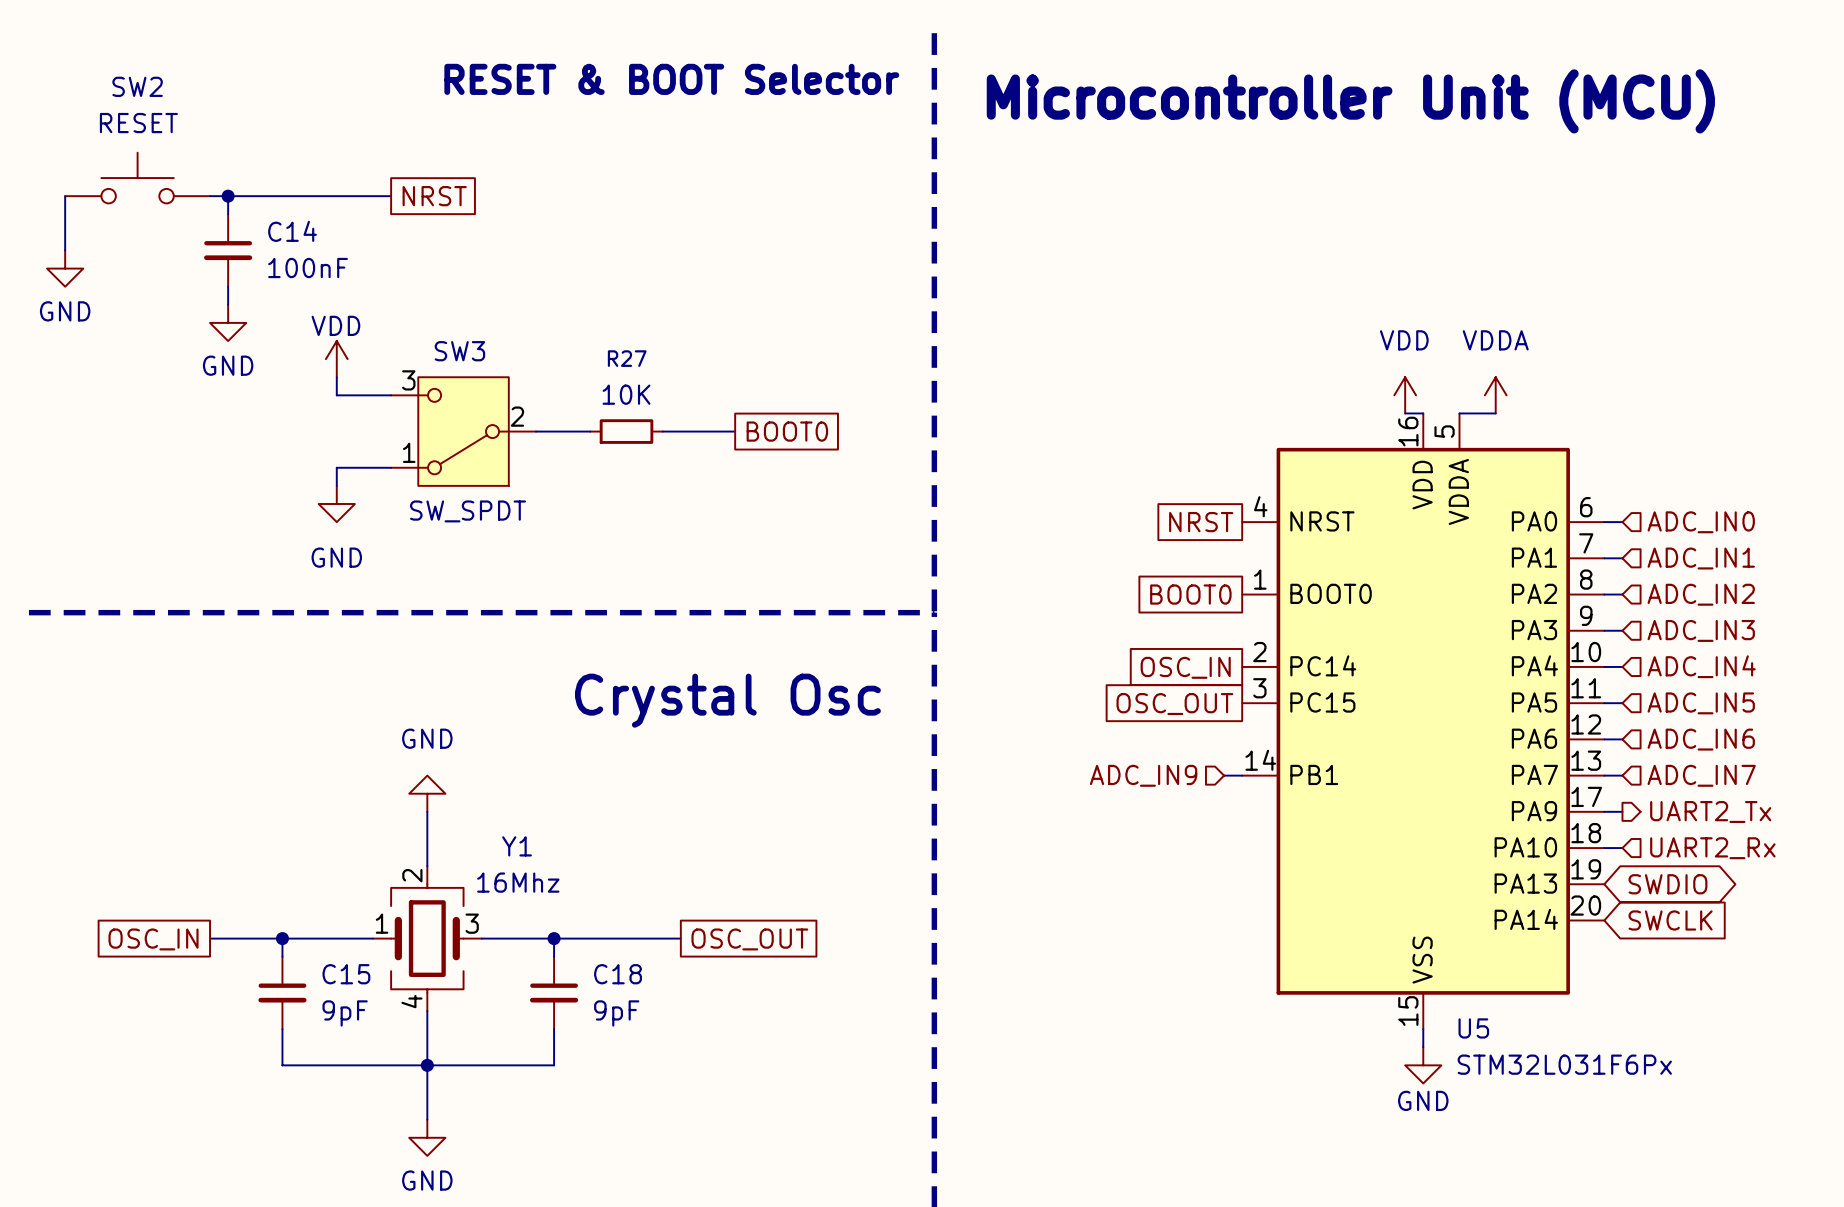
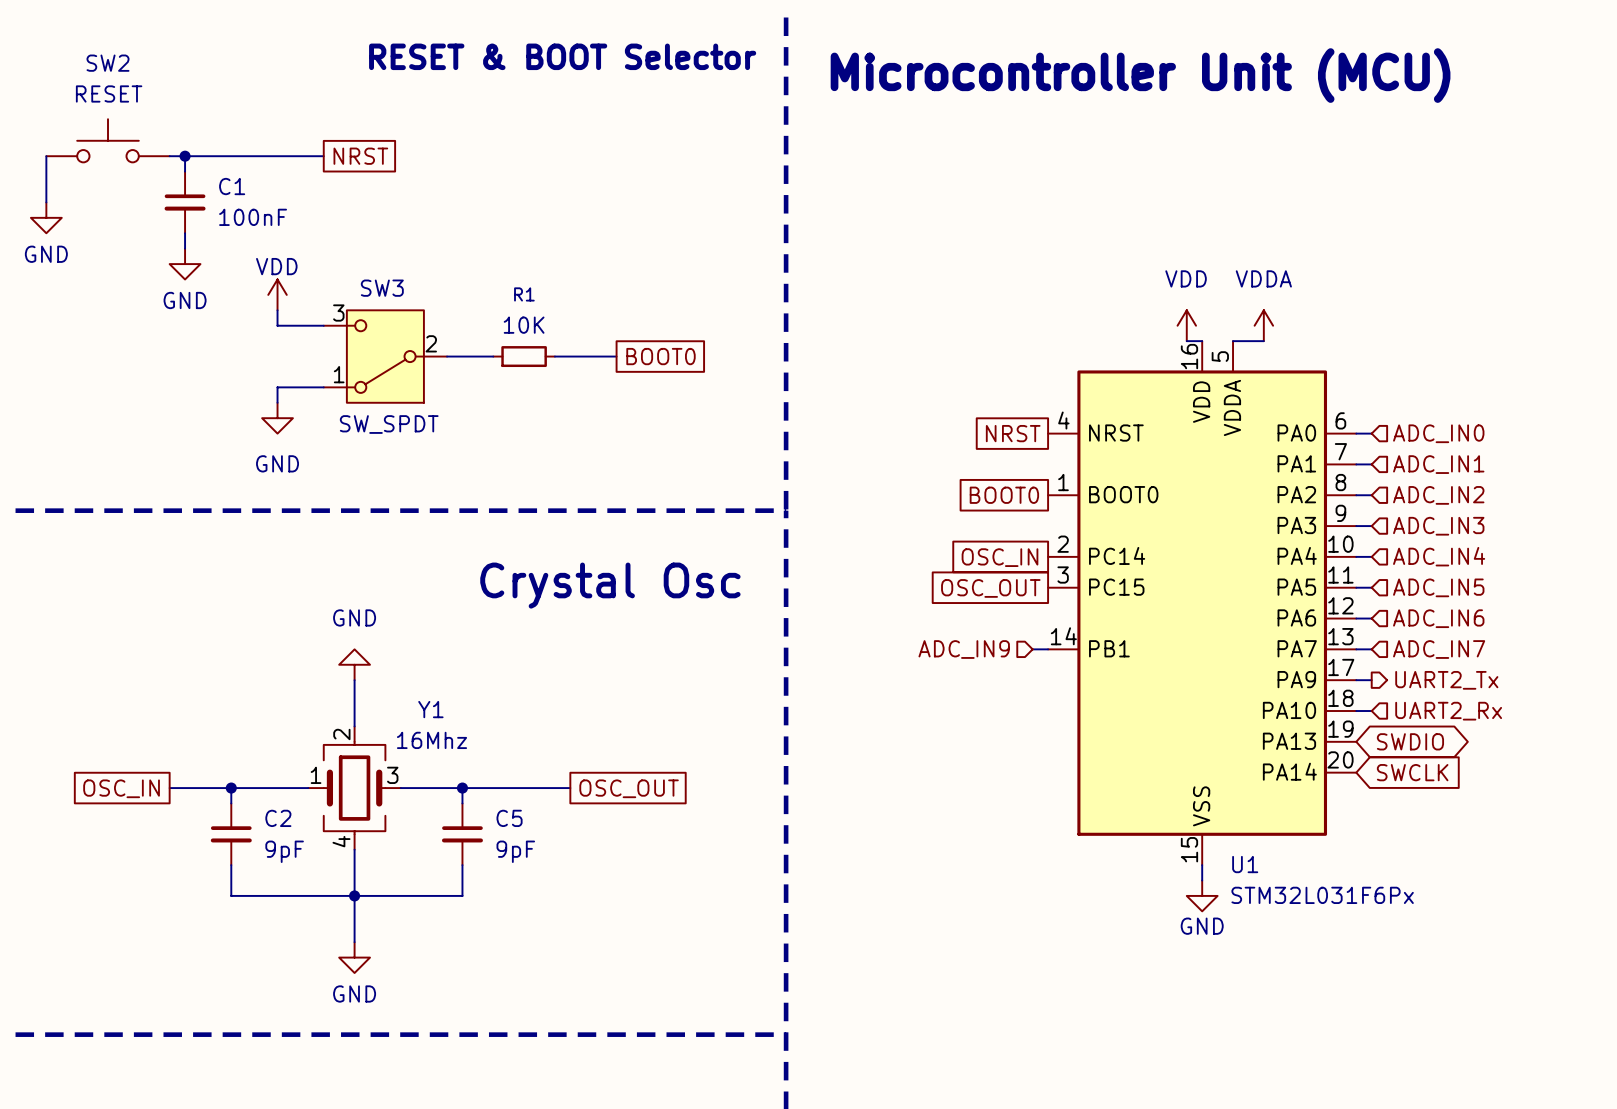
C14 name: C14 (292, 231) -> C1 (232, 186)
R27 name: R27 (627, 358) -> R1 (524, 294)
C15 name: C15 (346, 974) -> C2 (278, 818)
C18 name: C18 (618, 974) -> C5 (509, 818)
U5 name: U5 (1473, 1028) -> U1 (1245, 864)

